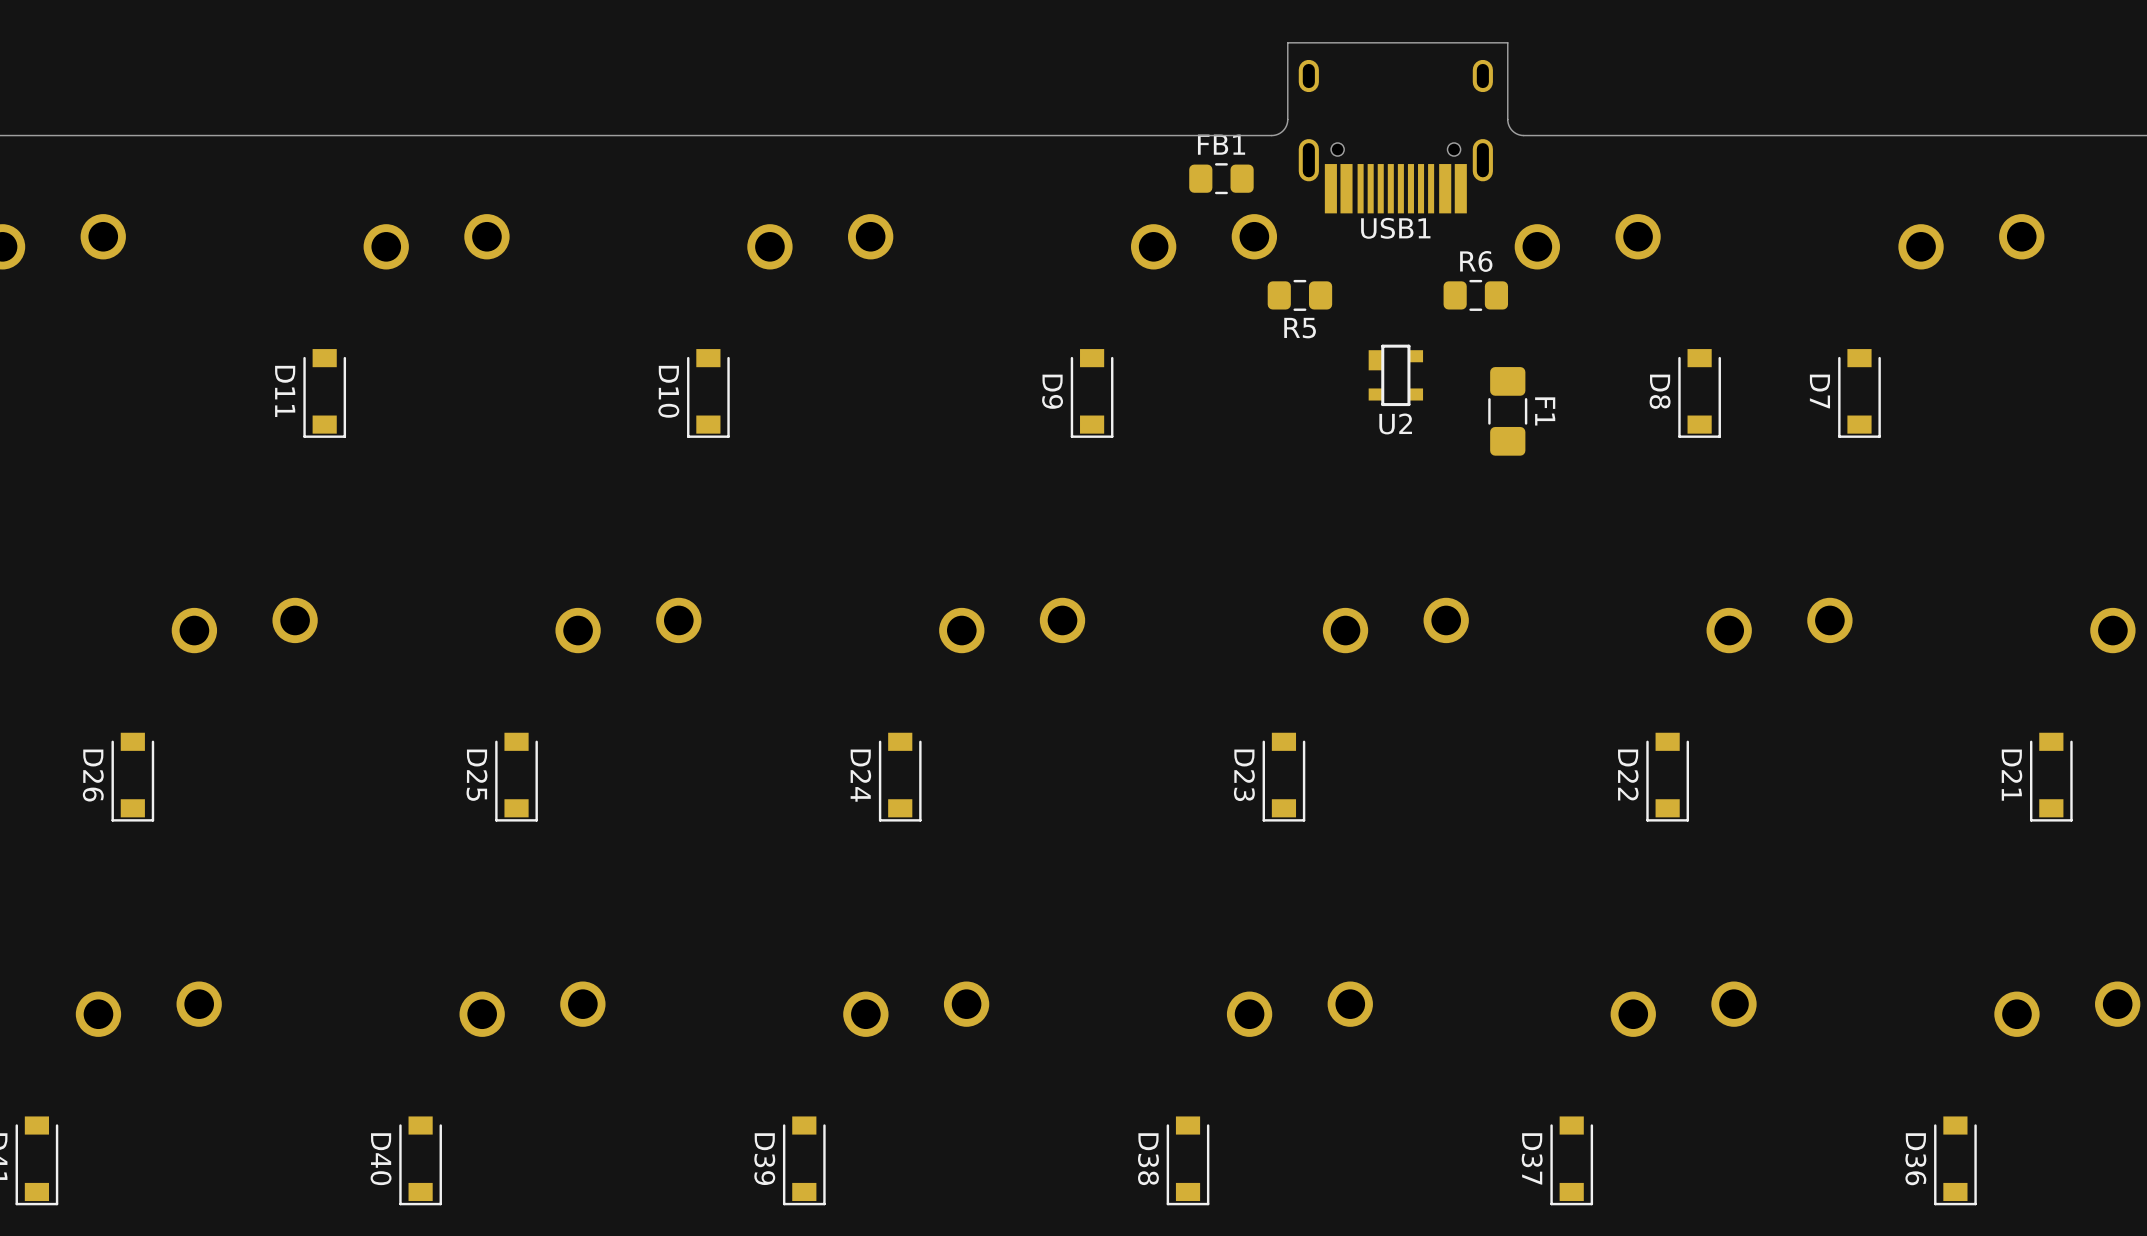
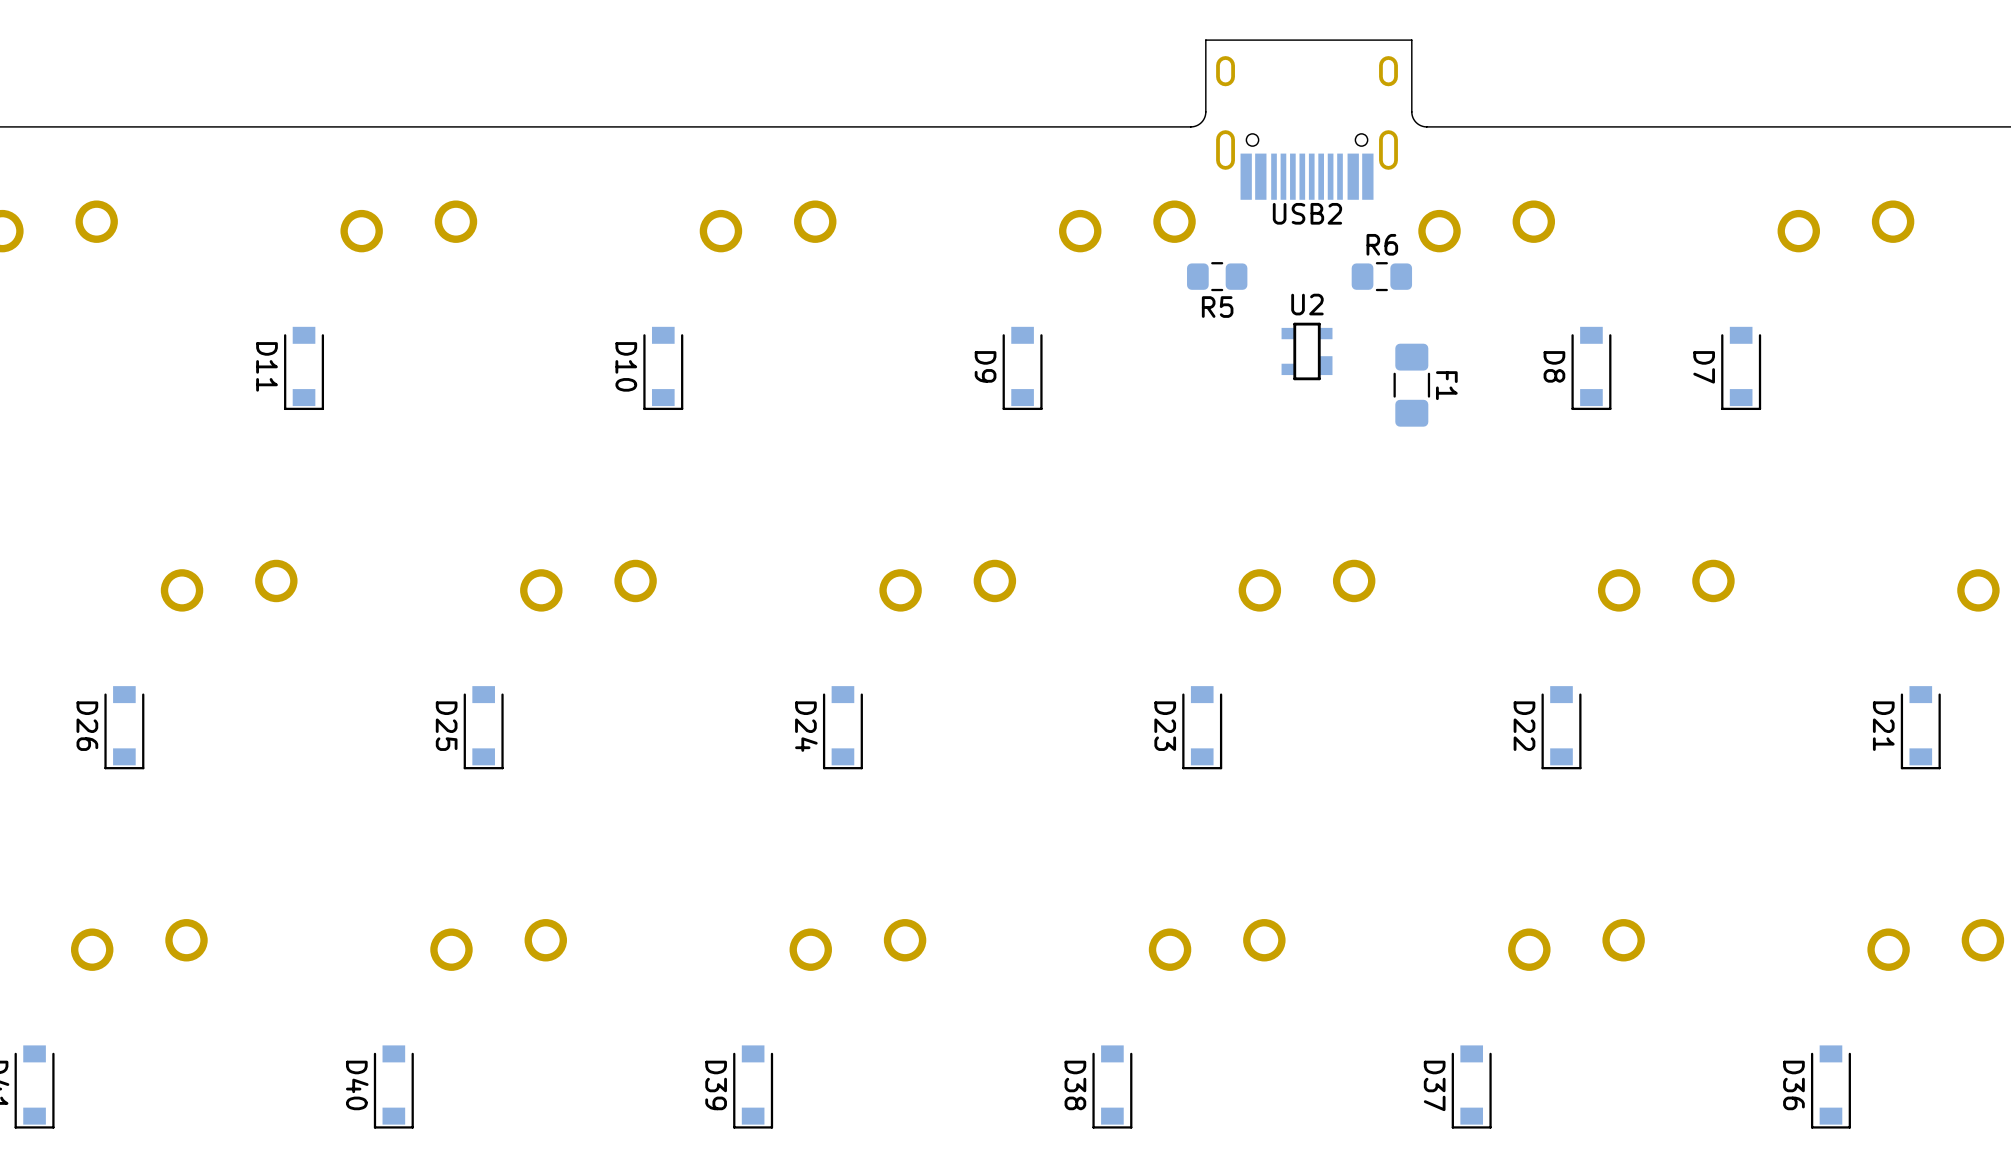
FB1: (1221, 178) -> none
USB1 name: USB1 (1395, 228) -> USB2 (1307, 213)
U2 rotation: 0° (1395, 375) -> 180° (1307, 351)

